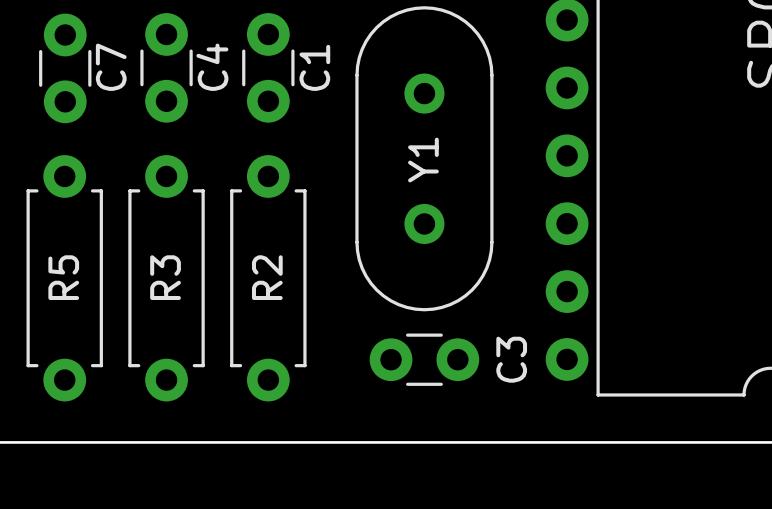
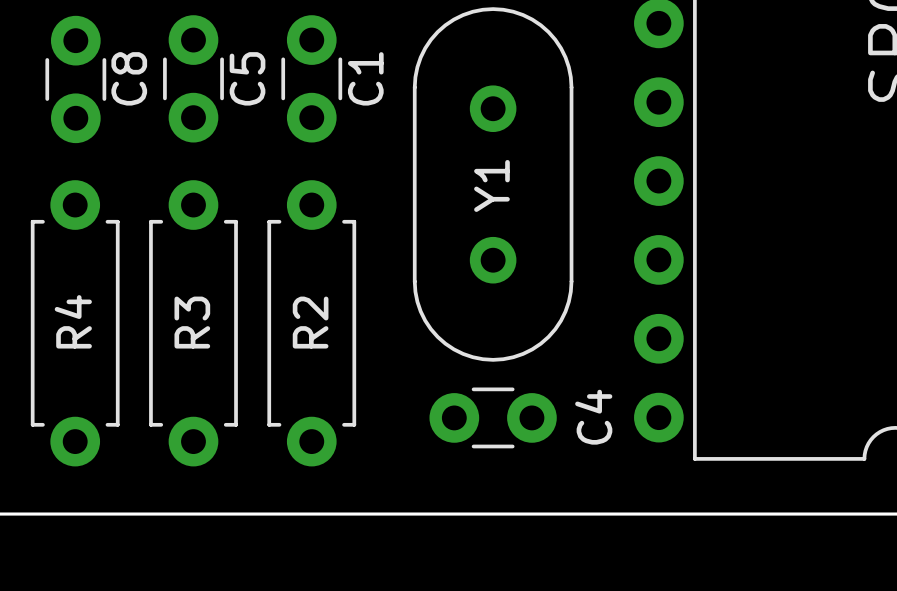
C7 name: C7 (111, 67) -> C8 (129, 78)
C4 name: C4 (212, 67) -> C5 (247, 78)
R5 name: R5 (63, 277) -> R4 (73, 321)
C3 name: C3 (511, 359) -> C4 (593, 417)

